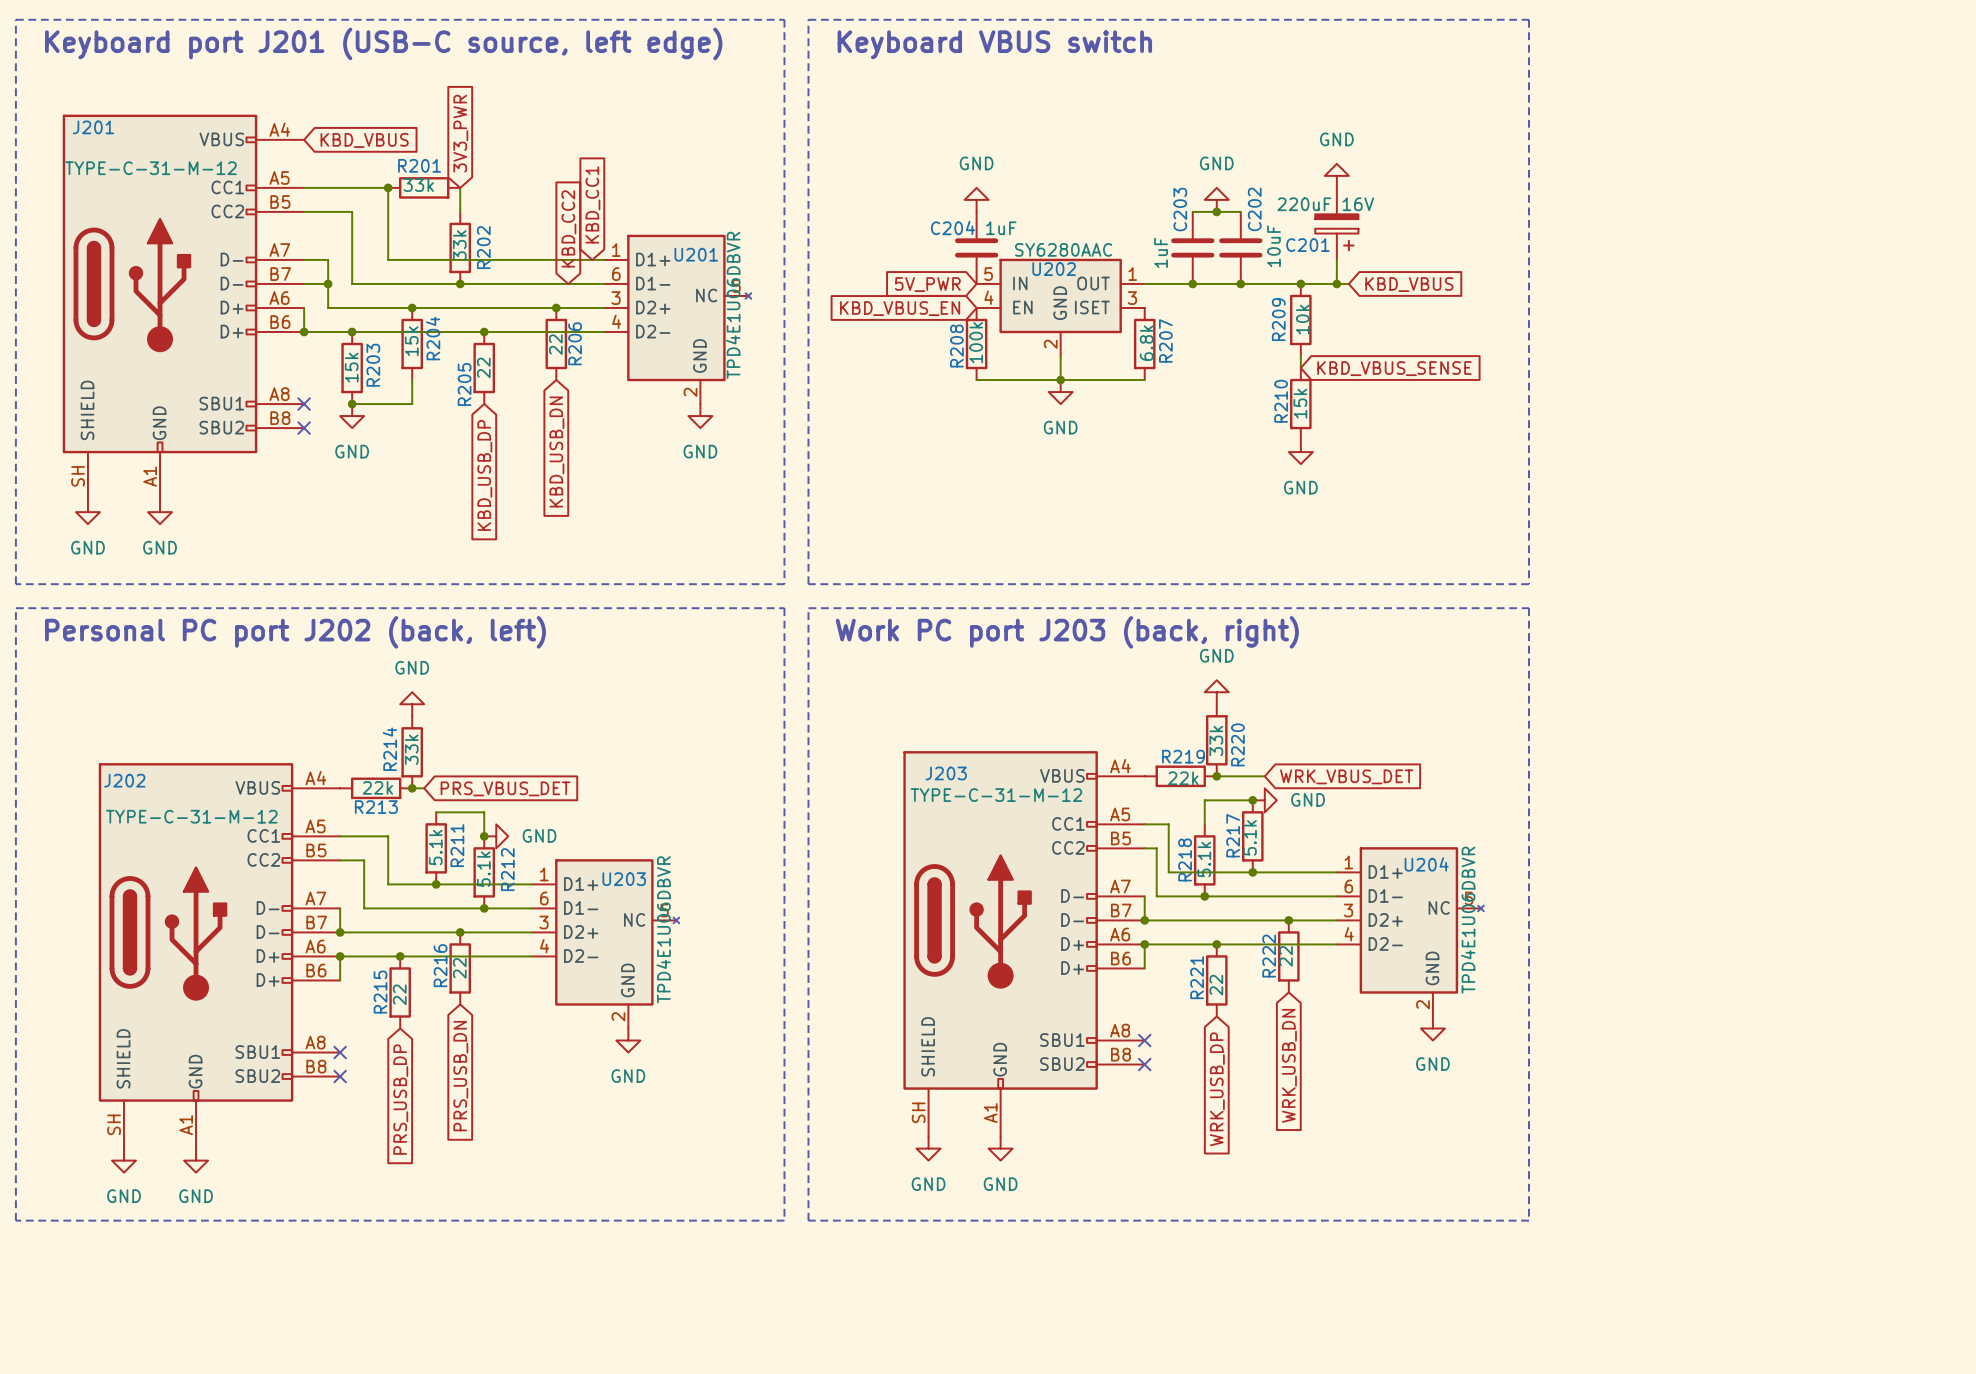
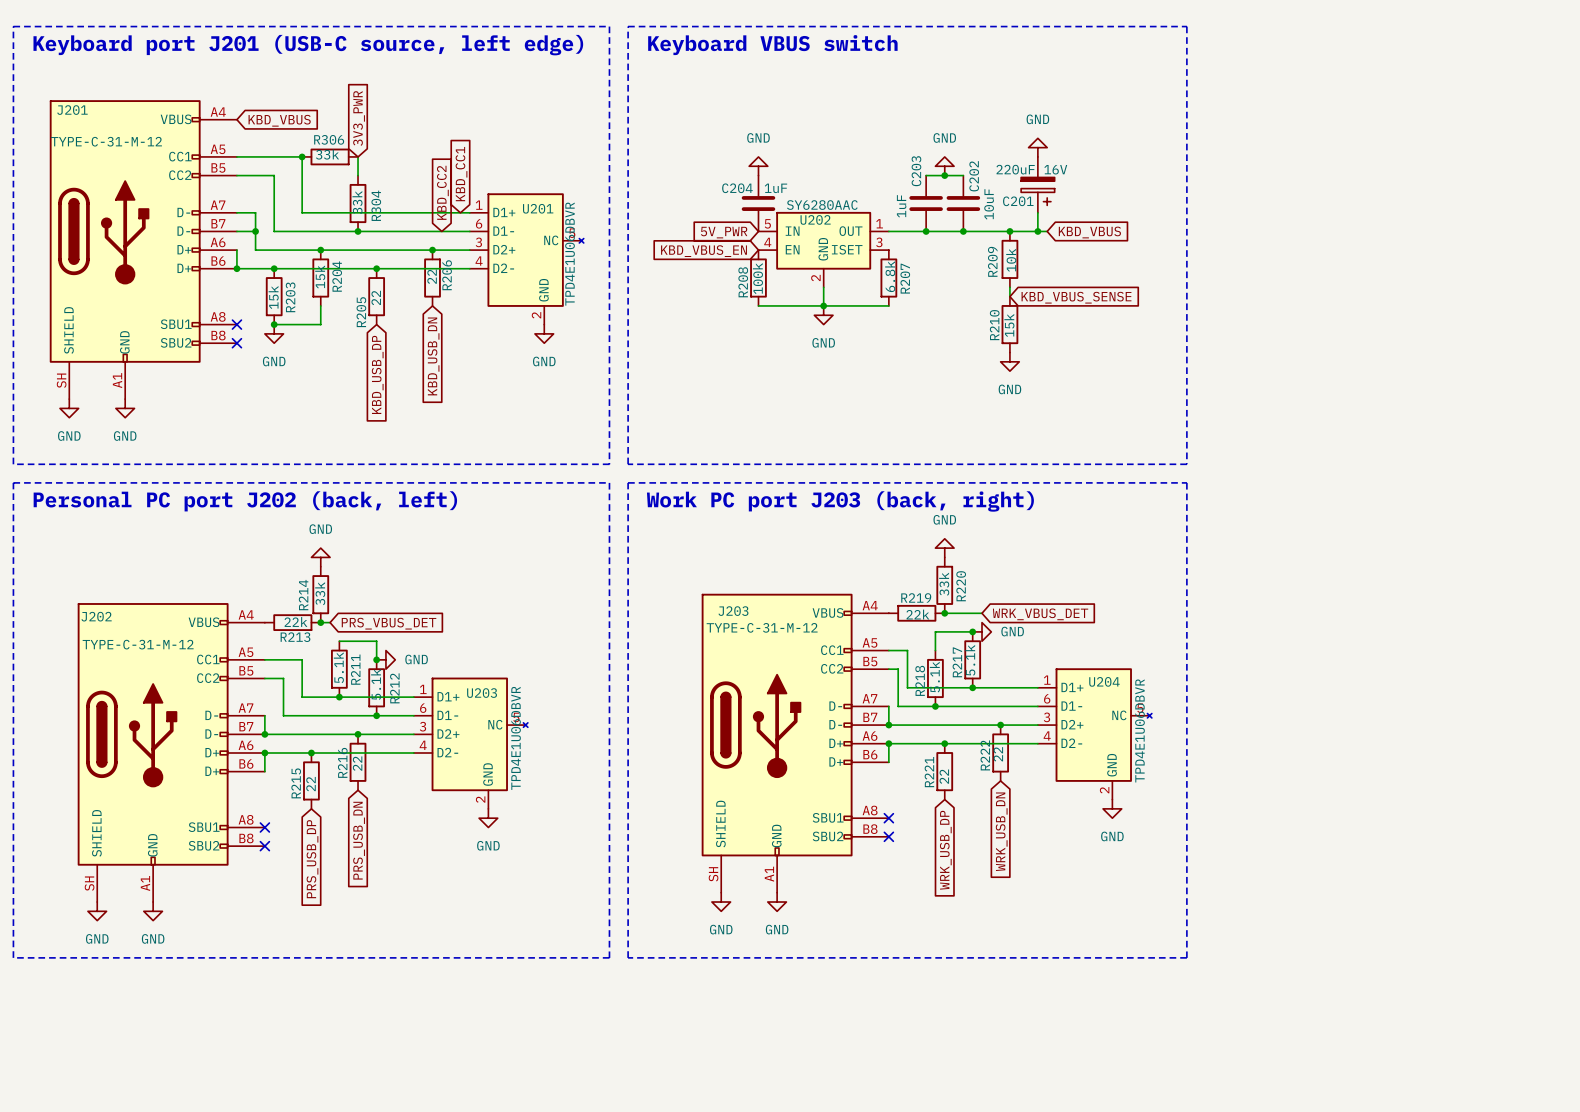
R201 name: R201 (419, 165) -> R306 (329, 139)
R202 name: R202 (483, 247) -> R304 (376, 205)

